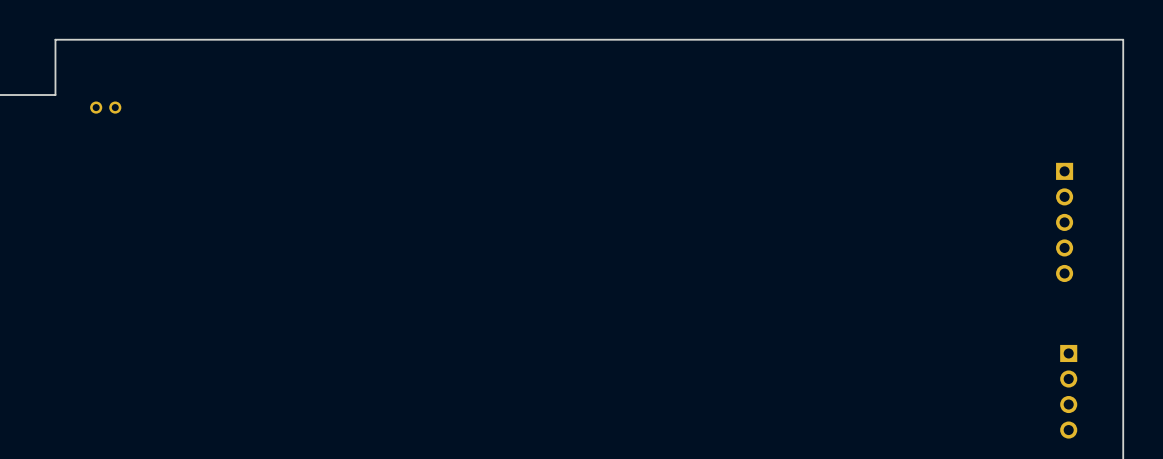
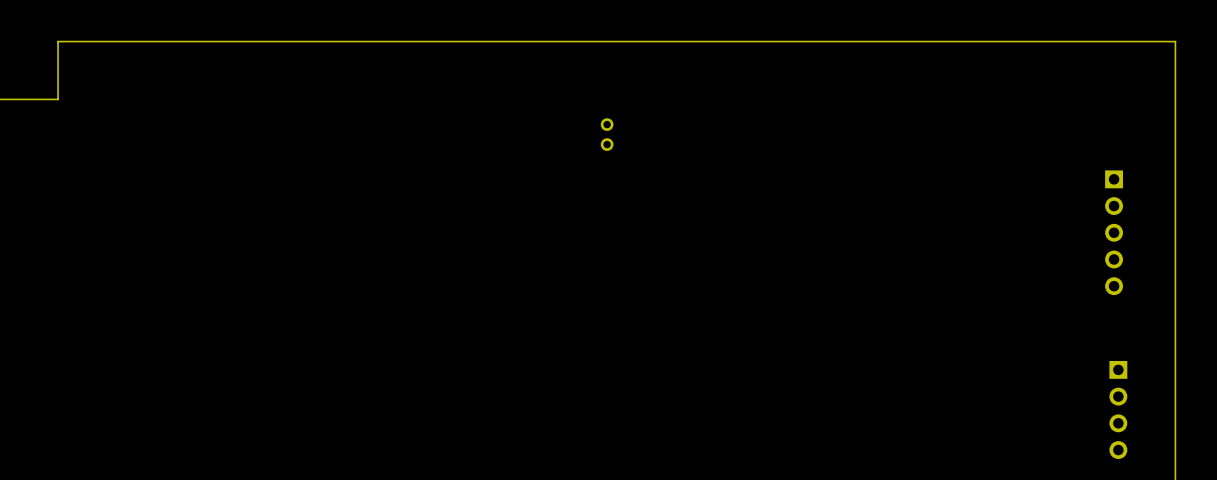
part: (105, 107) -> none
part: none -> (607, 134)

